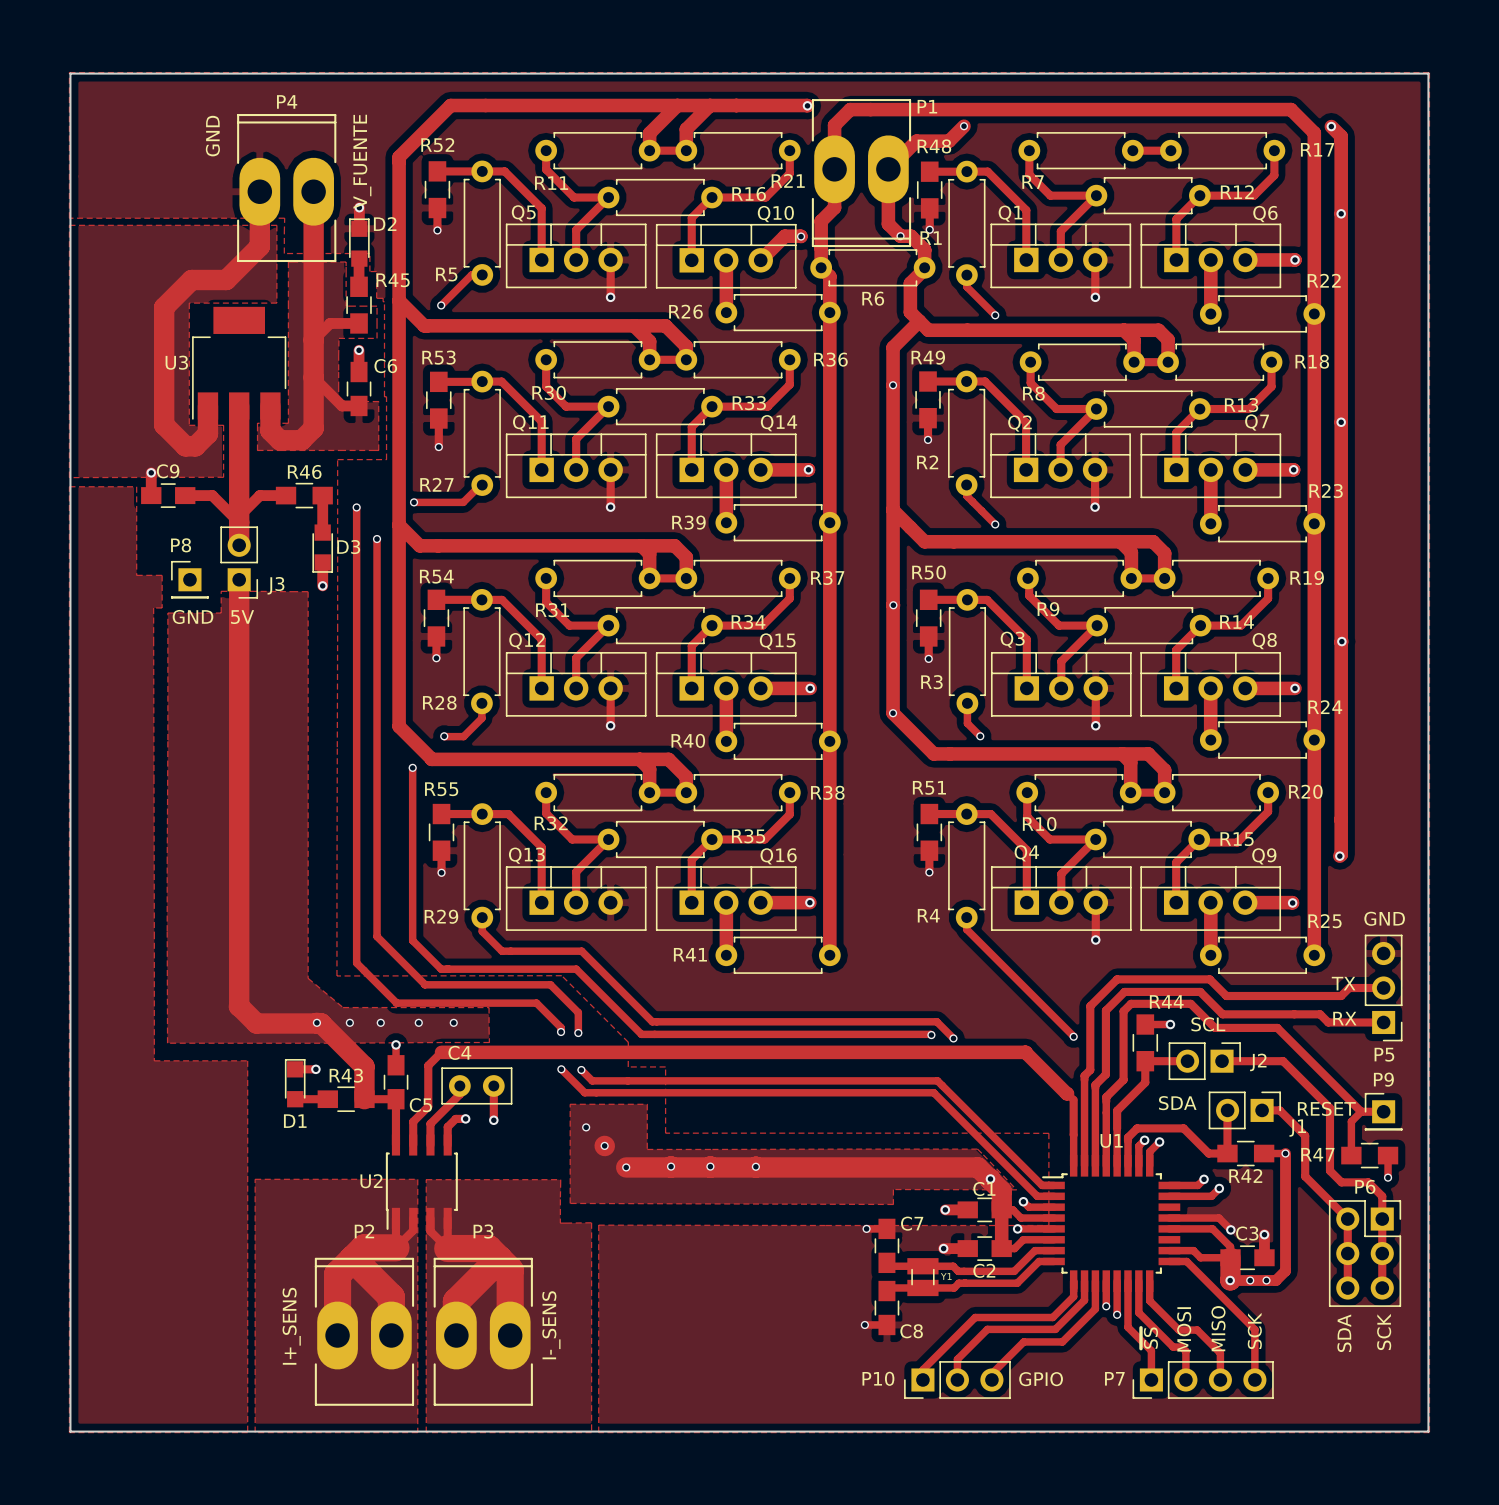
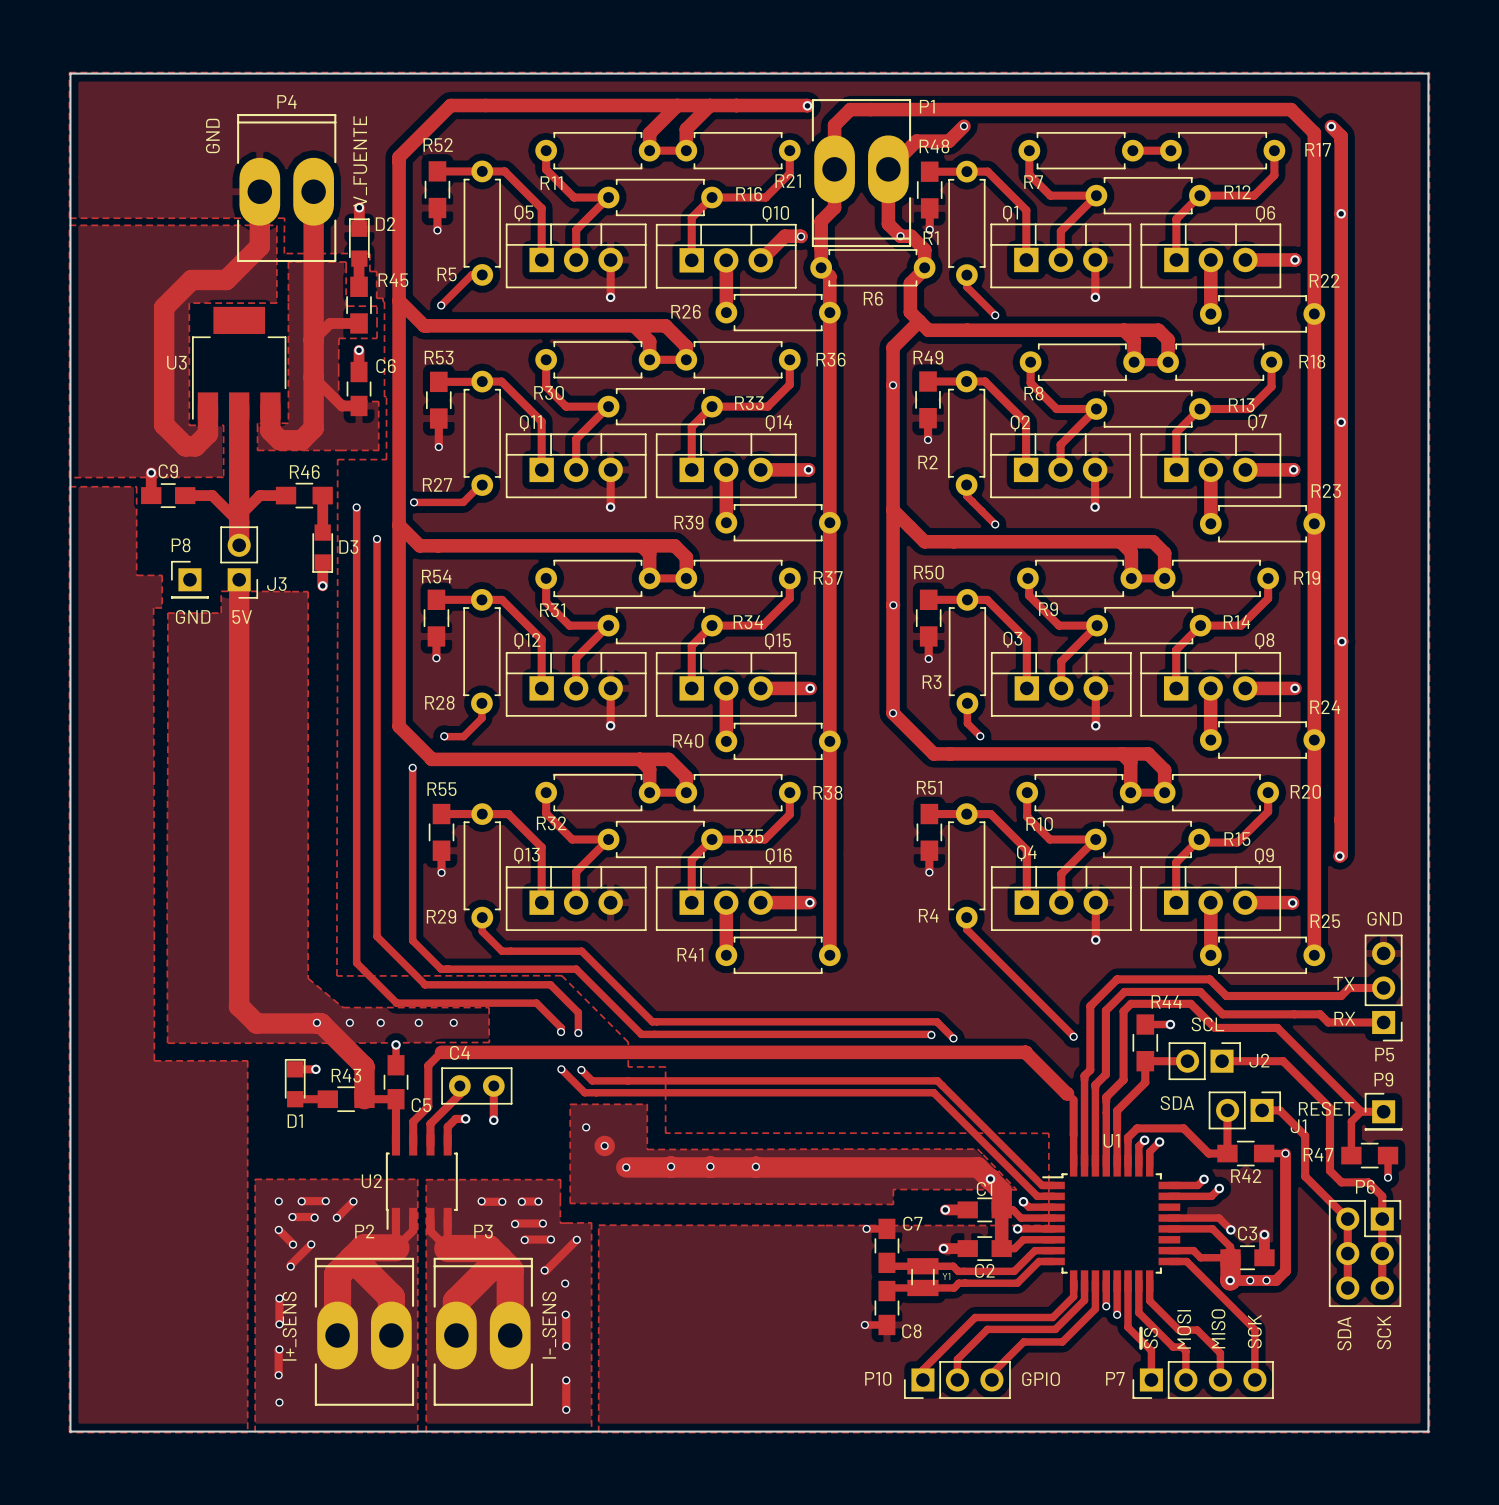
via: none -> (278, 1201)
via: none -> (301, 1201)
track: none -> (325, 1201) (301, 1201)
via: none -> (325, 1201)
track: none -> (353, 1201) (337, 1217)
via: none -> (353, 1201)
track: none -> (481, 1201) (502, 1201)
via: none -> (481, 1201)
via: none -> (502, 1201)
via: none -> (521, 1201)
track: none -> (538, 1201) (521, 1201)
via: none -> (538, 1201)
track: none -> (292, 1217) (314, 1217)
via: none -> (292, 1217)
via: none -> (314, 1217)
via: none -> (336, 1217)
track: none -> (542, 1223) (515, 1224)
via: none -> (542, 1223)
via: none -> (515, 1224)
track: none -> (278, 1229) (293, 1244)
via: none -> (278, 1229)
track: none -> (550, 1239) (524, 1240)
via: none -> (550, 1239)
track: none -> (576, 1239) (544, 1270)
via: none -> (576, 1239)
via: none -> (524, 1240)
via: none -> (293, 1244)
track: none -> (311, 1244) (290, 1266)
via: none -> (311, 1244)
via: none -> (290, 1266)
via: none -> (544, 1270)
via: none -> (565, 1283)
track: none -> (279, 1298) (279, 1324)
via: none -> (279, 1298)
track: none -> (565, 1314) (566, 1346)
via: none -> (565, 1314)
via: none -> (279, 1324)
via: none -> (566, 1346)
track: none -> (279, 1349) (278, 1375)
via: none -> (279, 1349)
via: none -> (278, 1375)
track: none -> (566, 1380) (566, 1409)
via: none -> (566, 1380)
via: none -> (279, 1402)
via: none -> (566, 1409)

